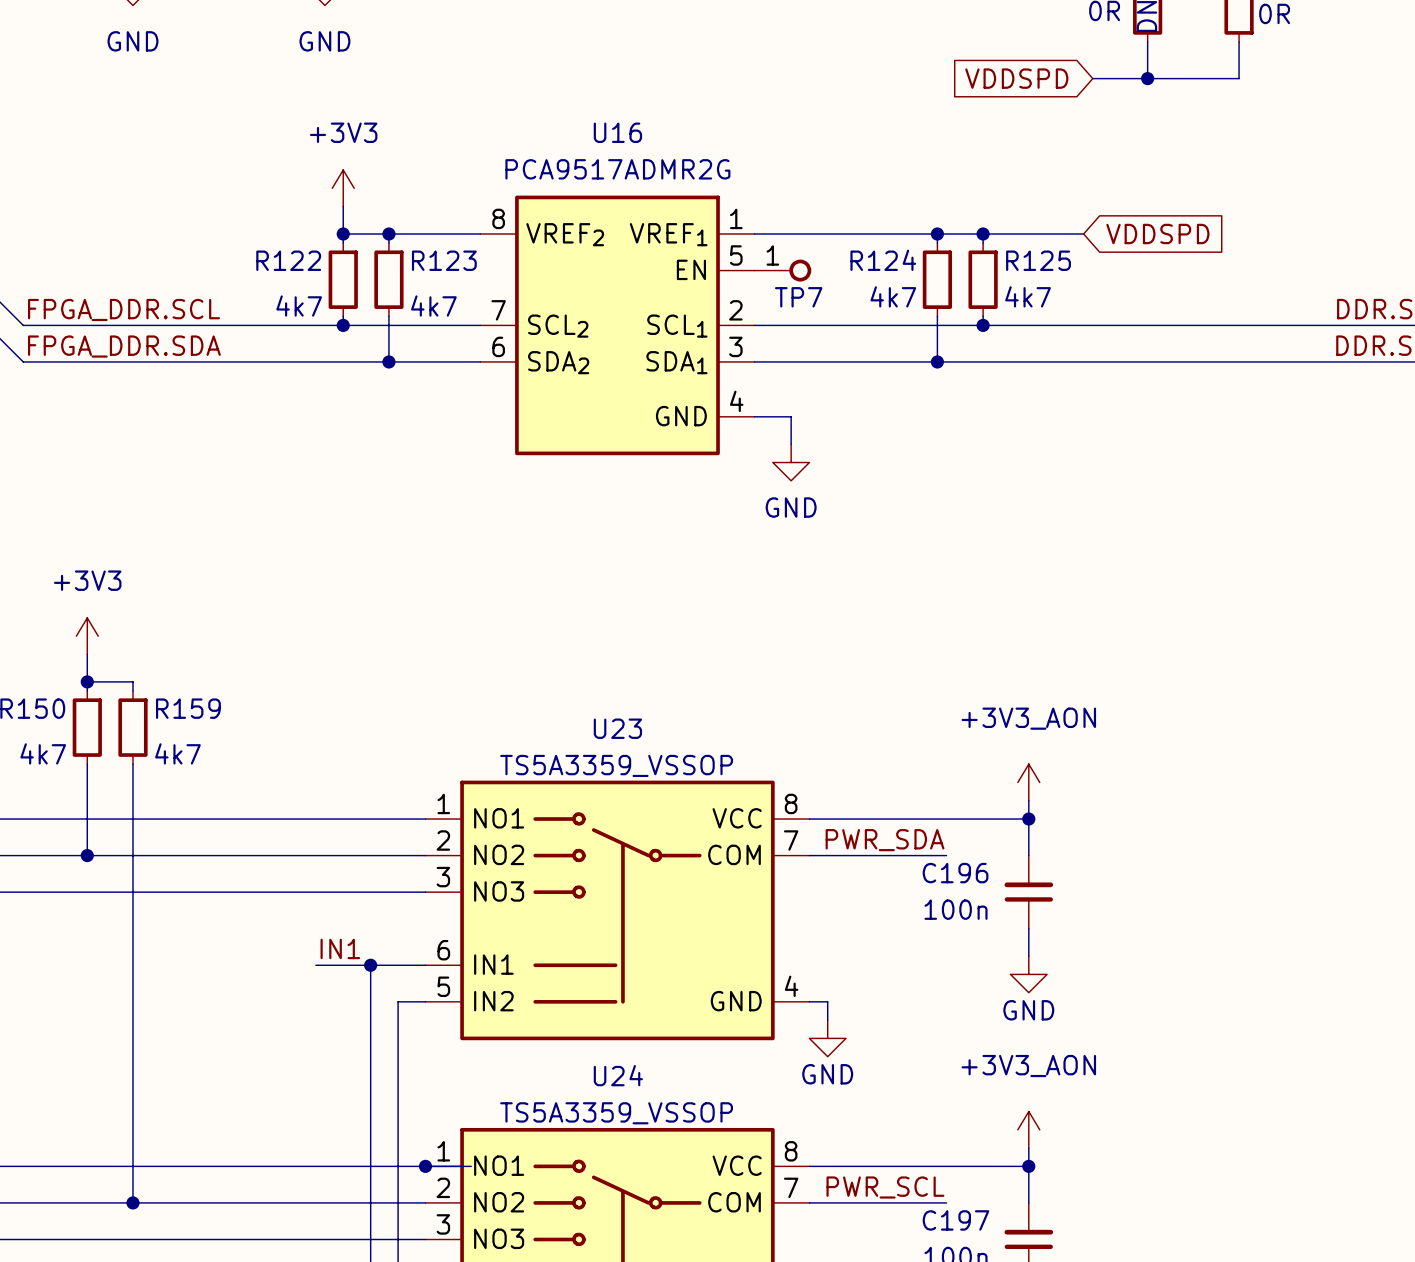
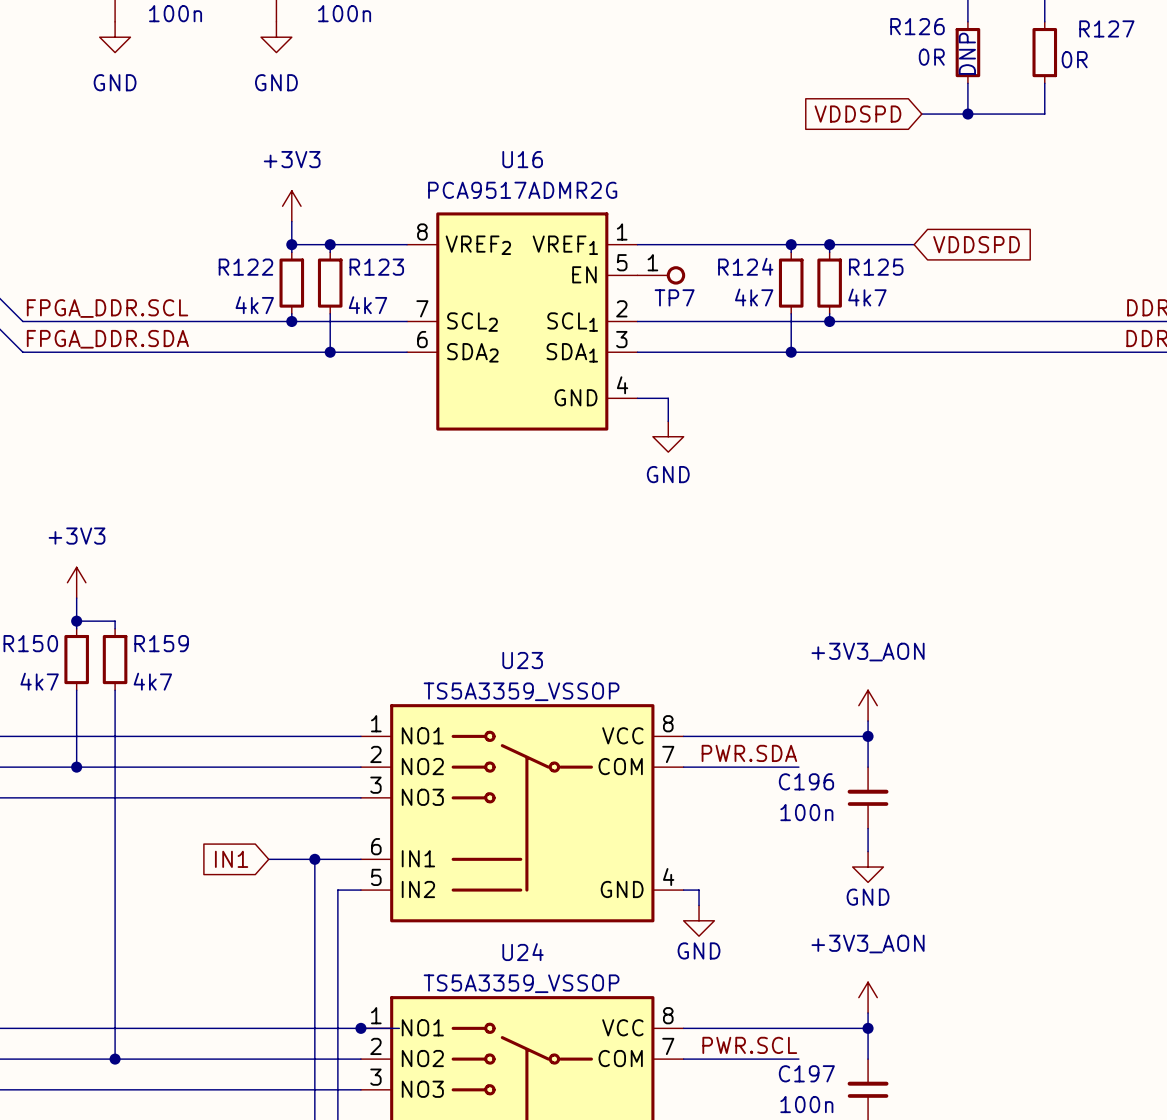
label: PWR_SDA (885, 840) -> PWR.SDA (749, 753)
label: IN1 (340, 948) -> none
global label: none -> IN1 (231, 859)
label: PWR_SCL (885, 1187) -> PWR.SCL (749, 1045)

